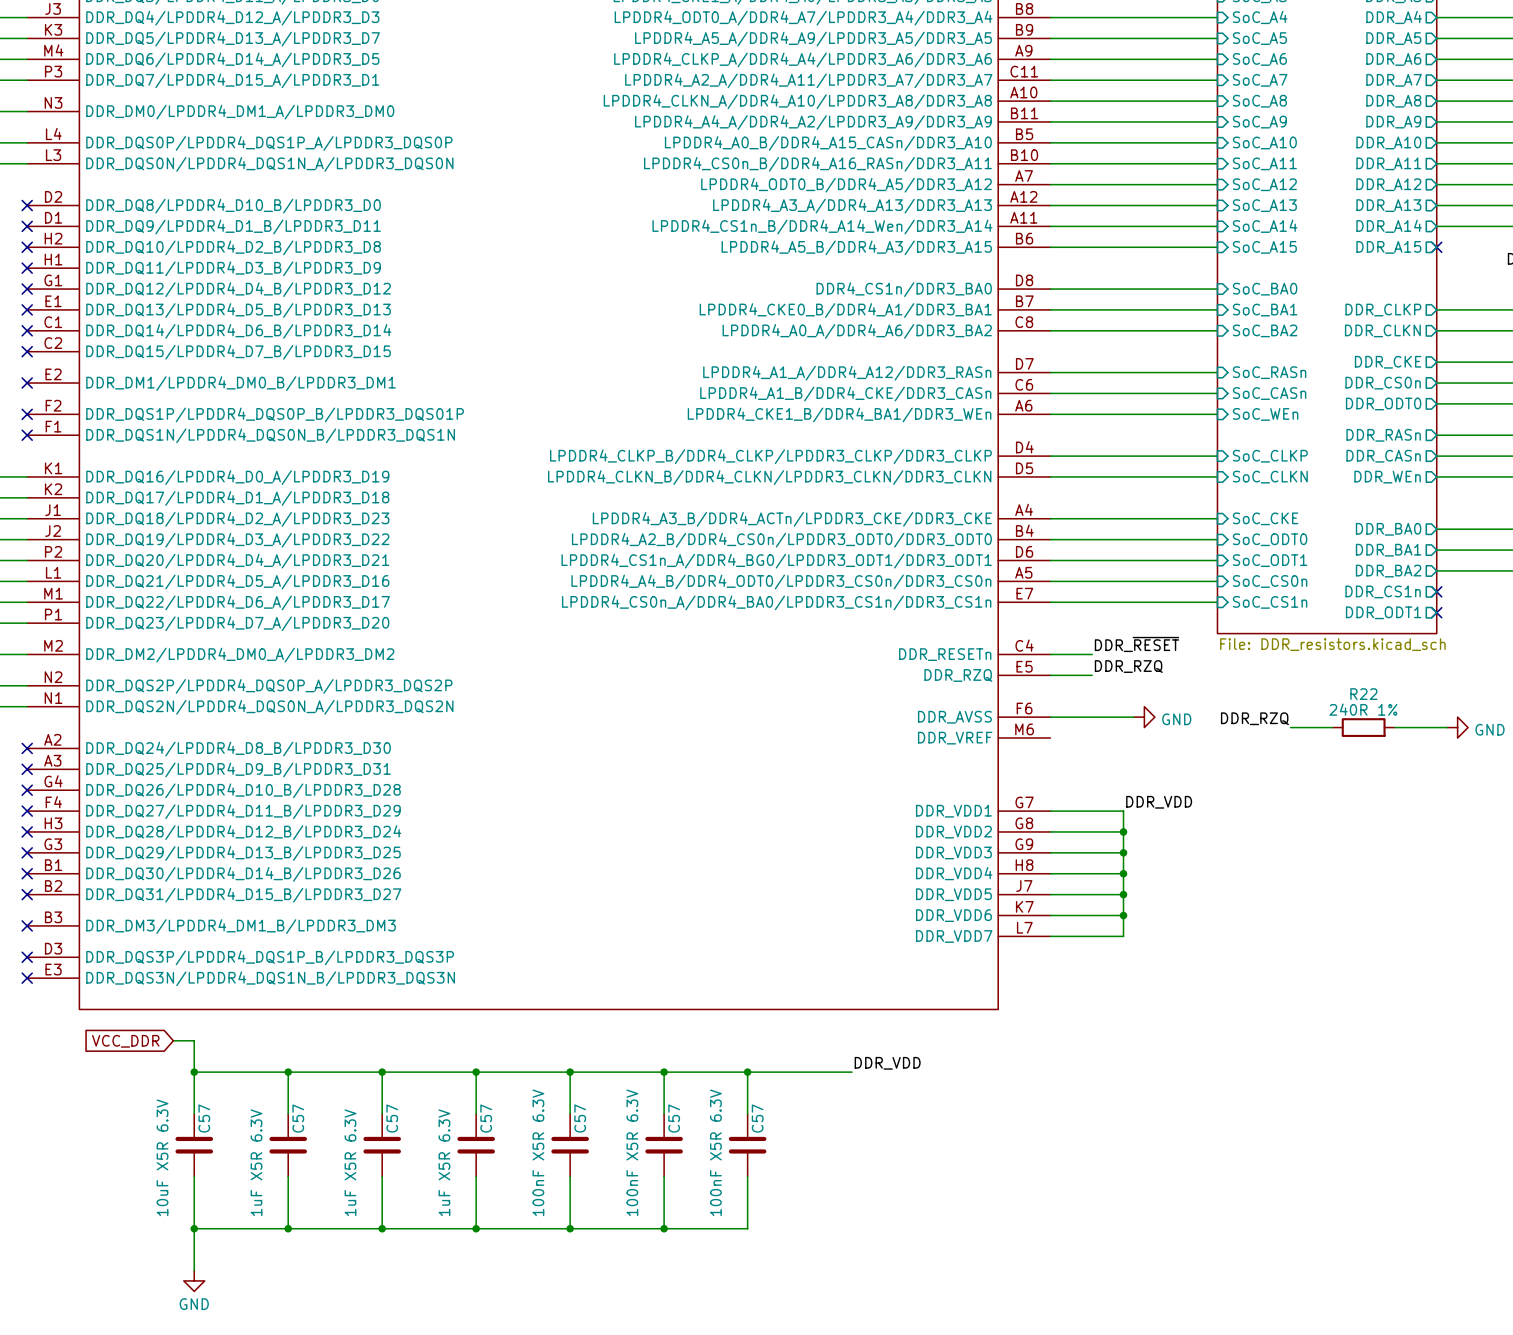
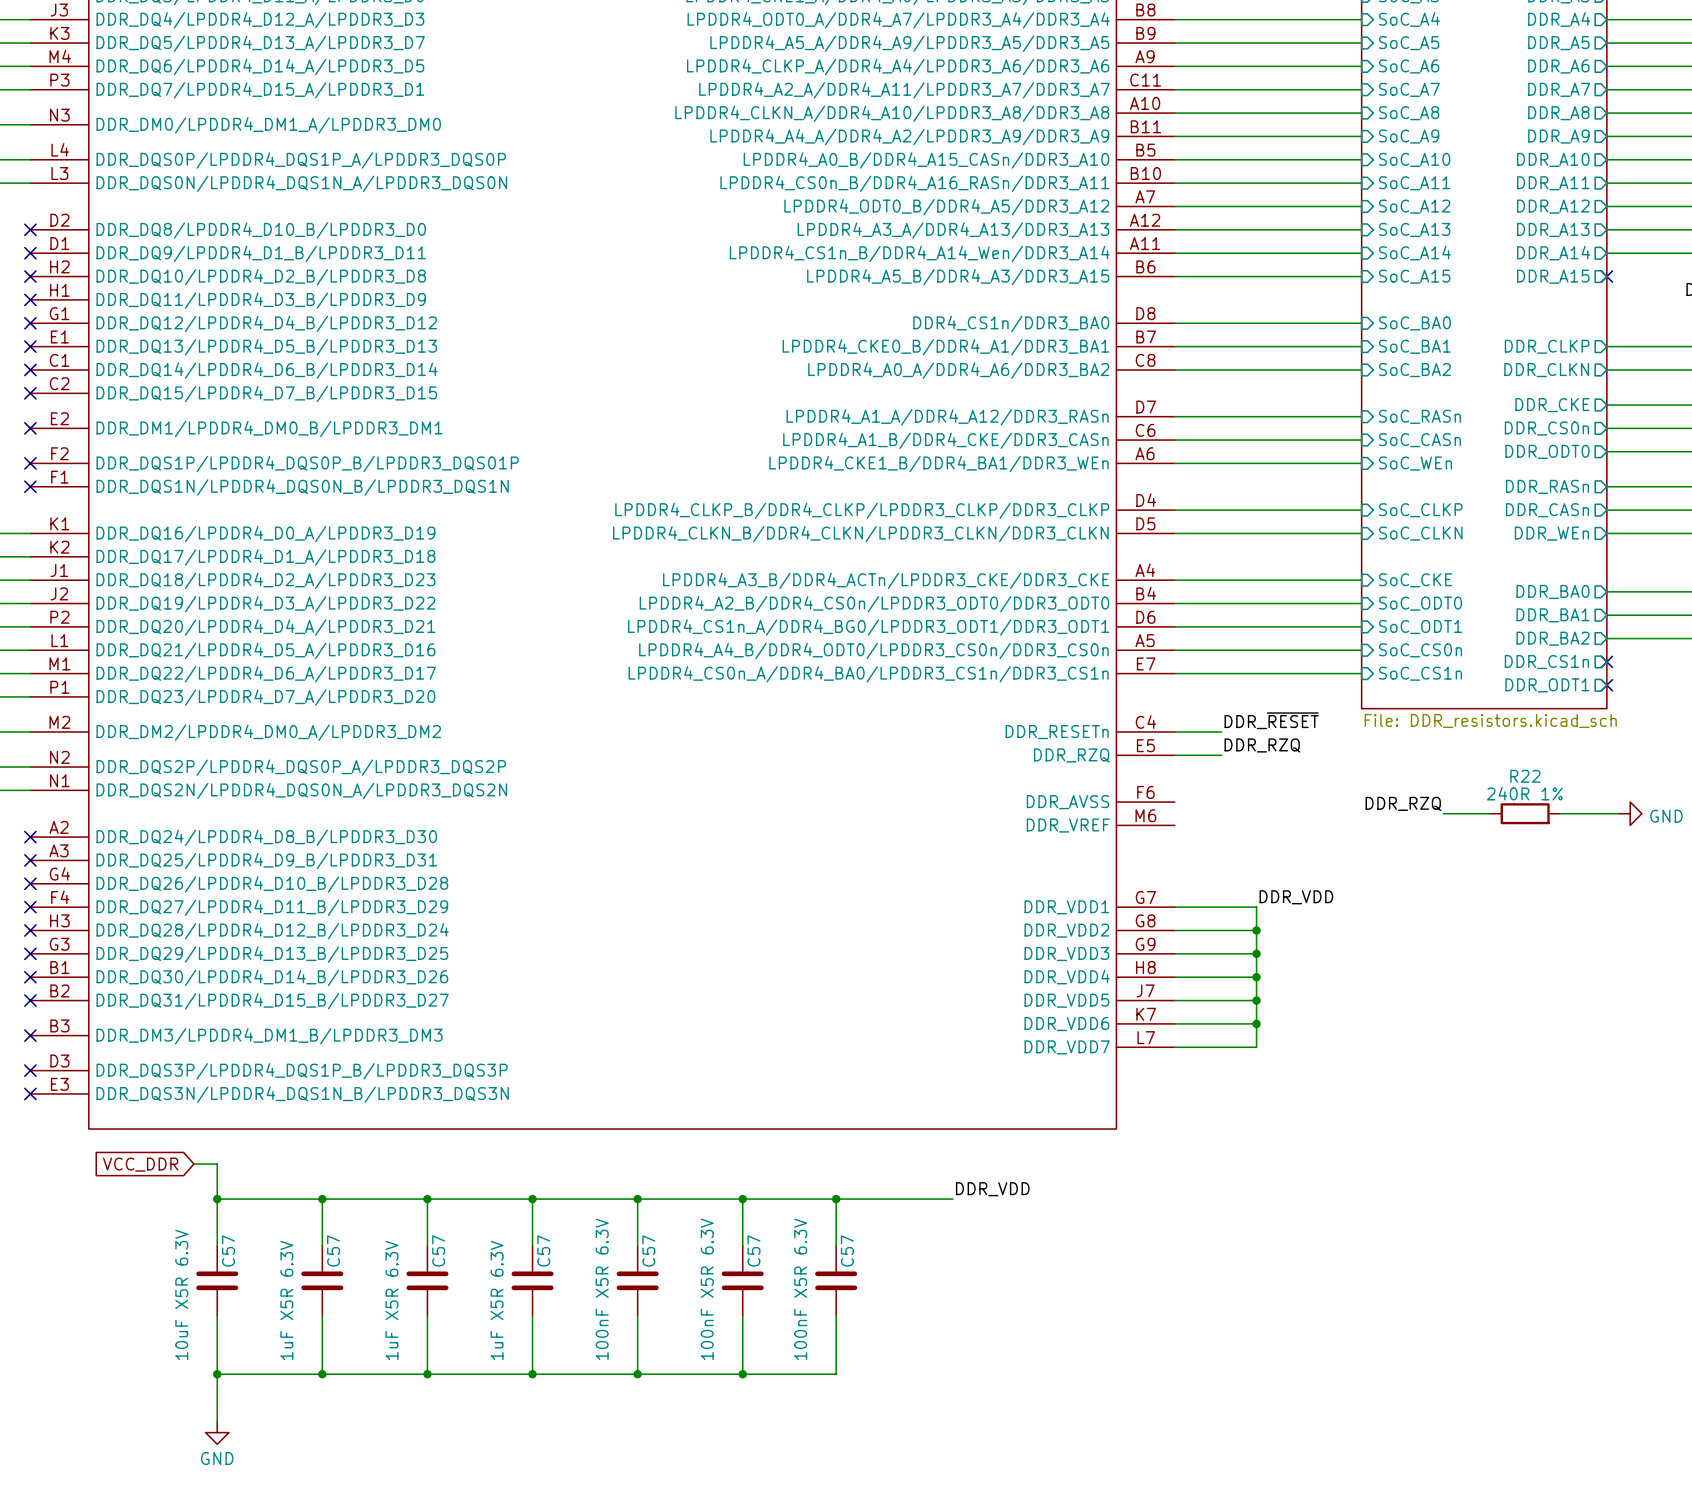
wire: (1050, 717) (1133, 717) -> none
power symbol: GND (1144, 717) -> none

